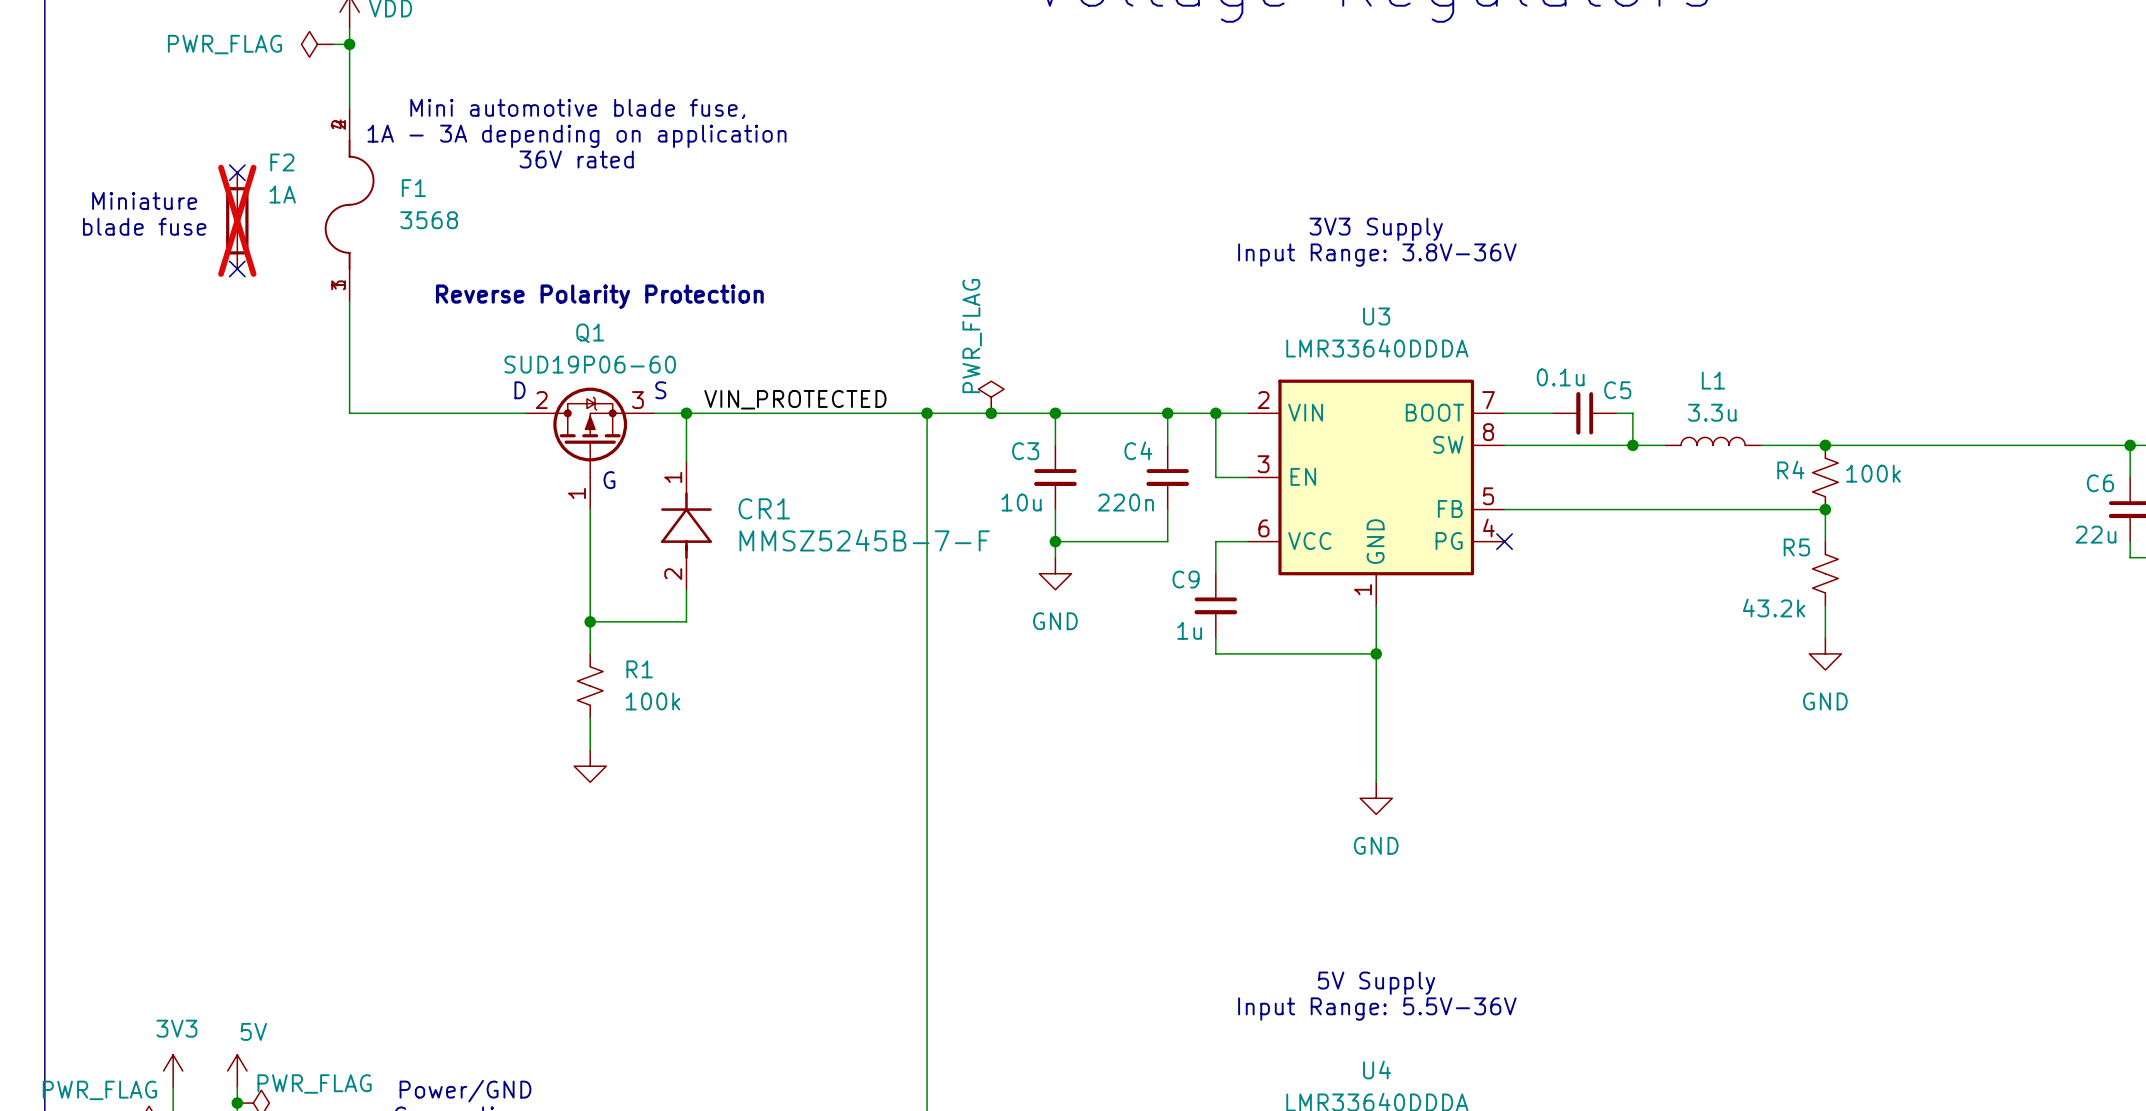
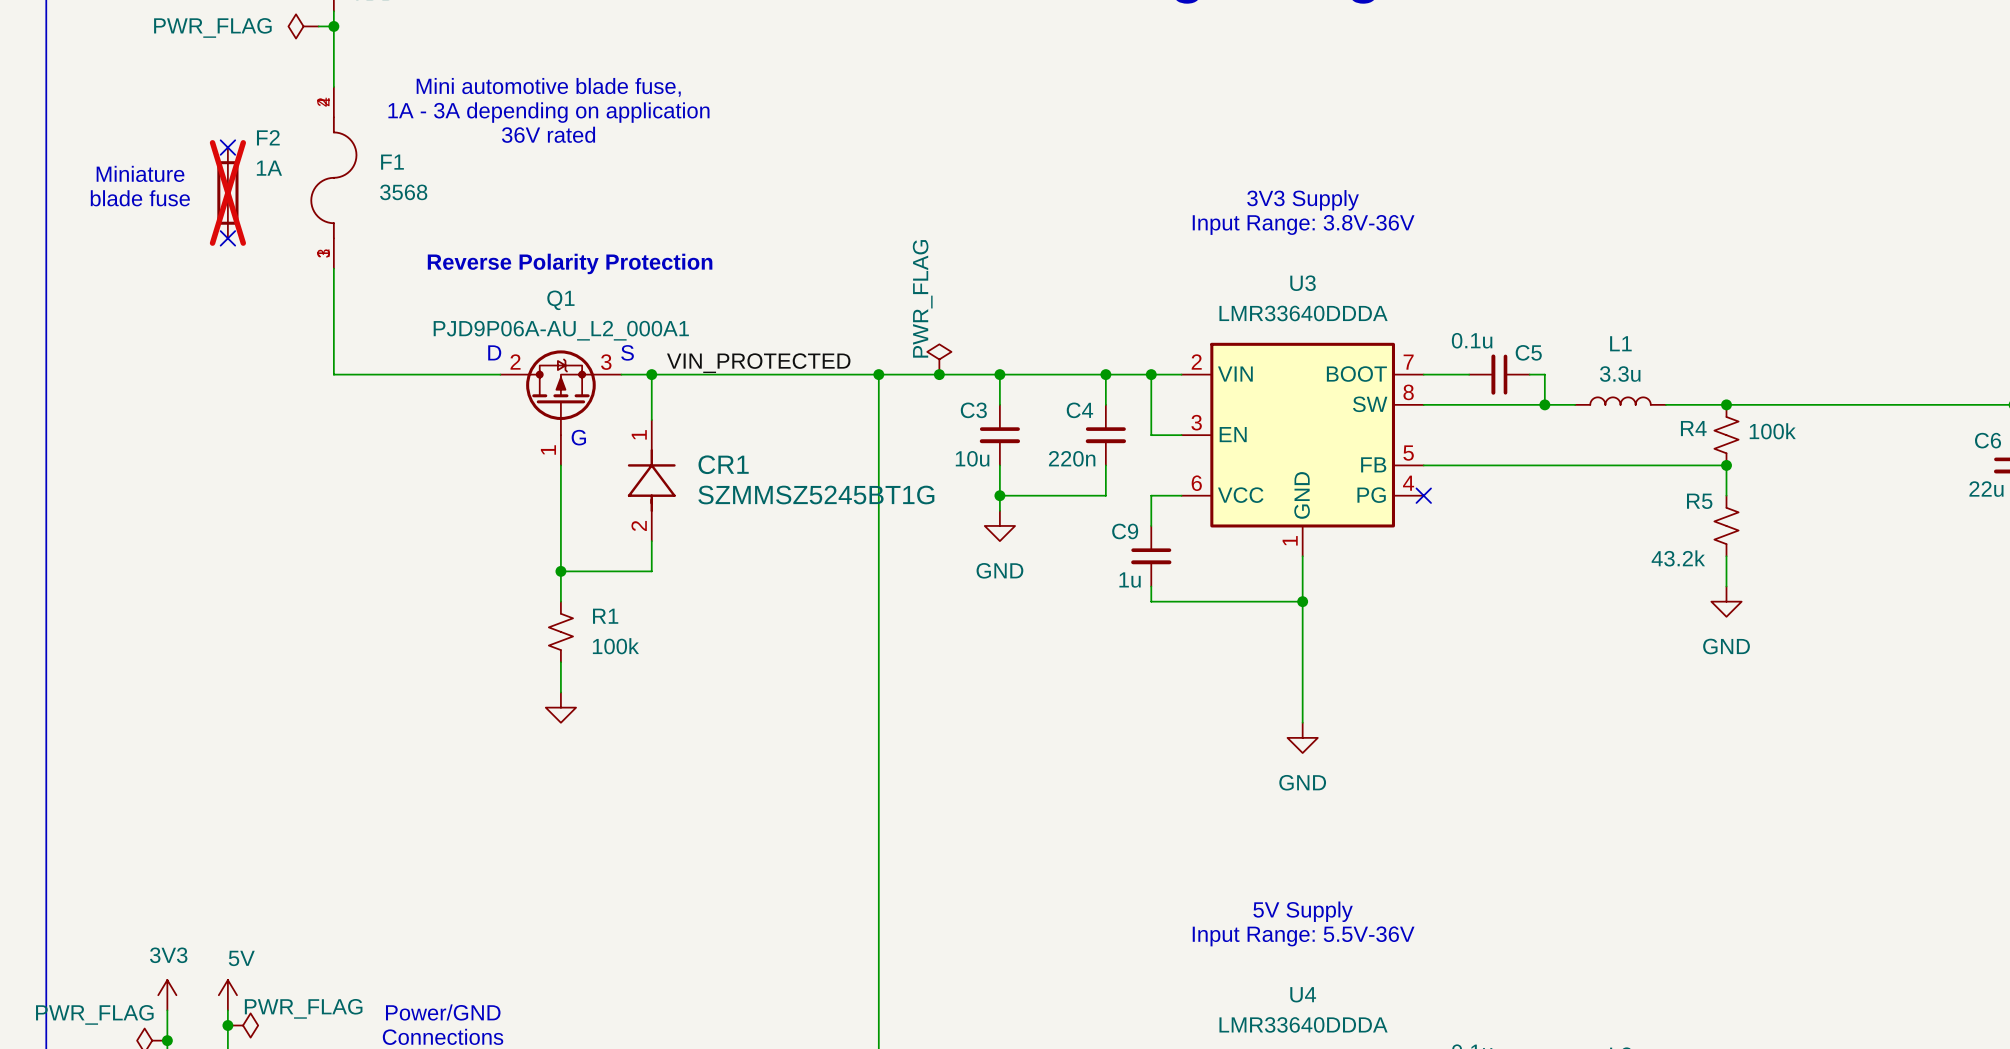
Q1 value: SUD19P06-60 (590, 364) -> PJD9P06A-AU_L2_000A1 (561, 330)
CR1 value: MMSZ5245B-7-F (864, 540) -> SZMMSZ5245BT1G (816, 495)

